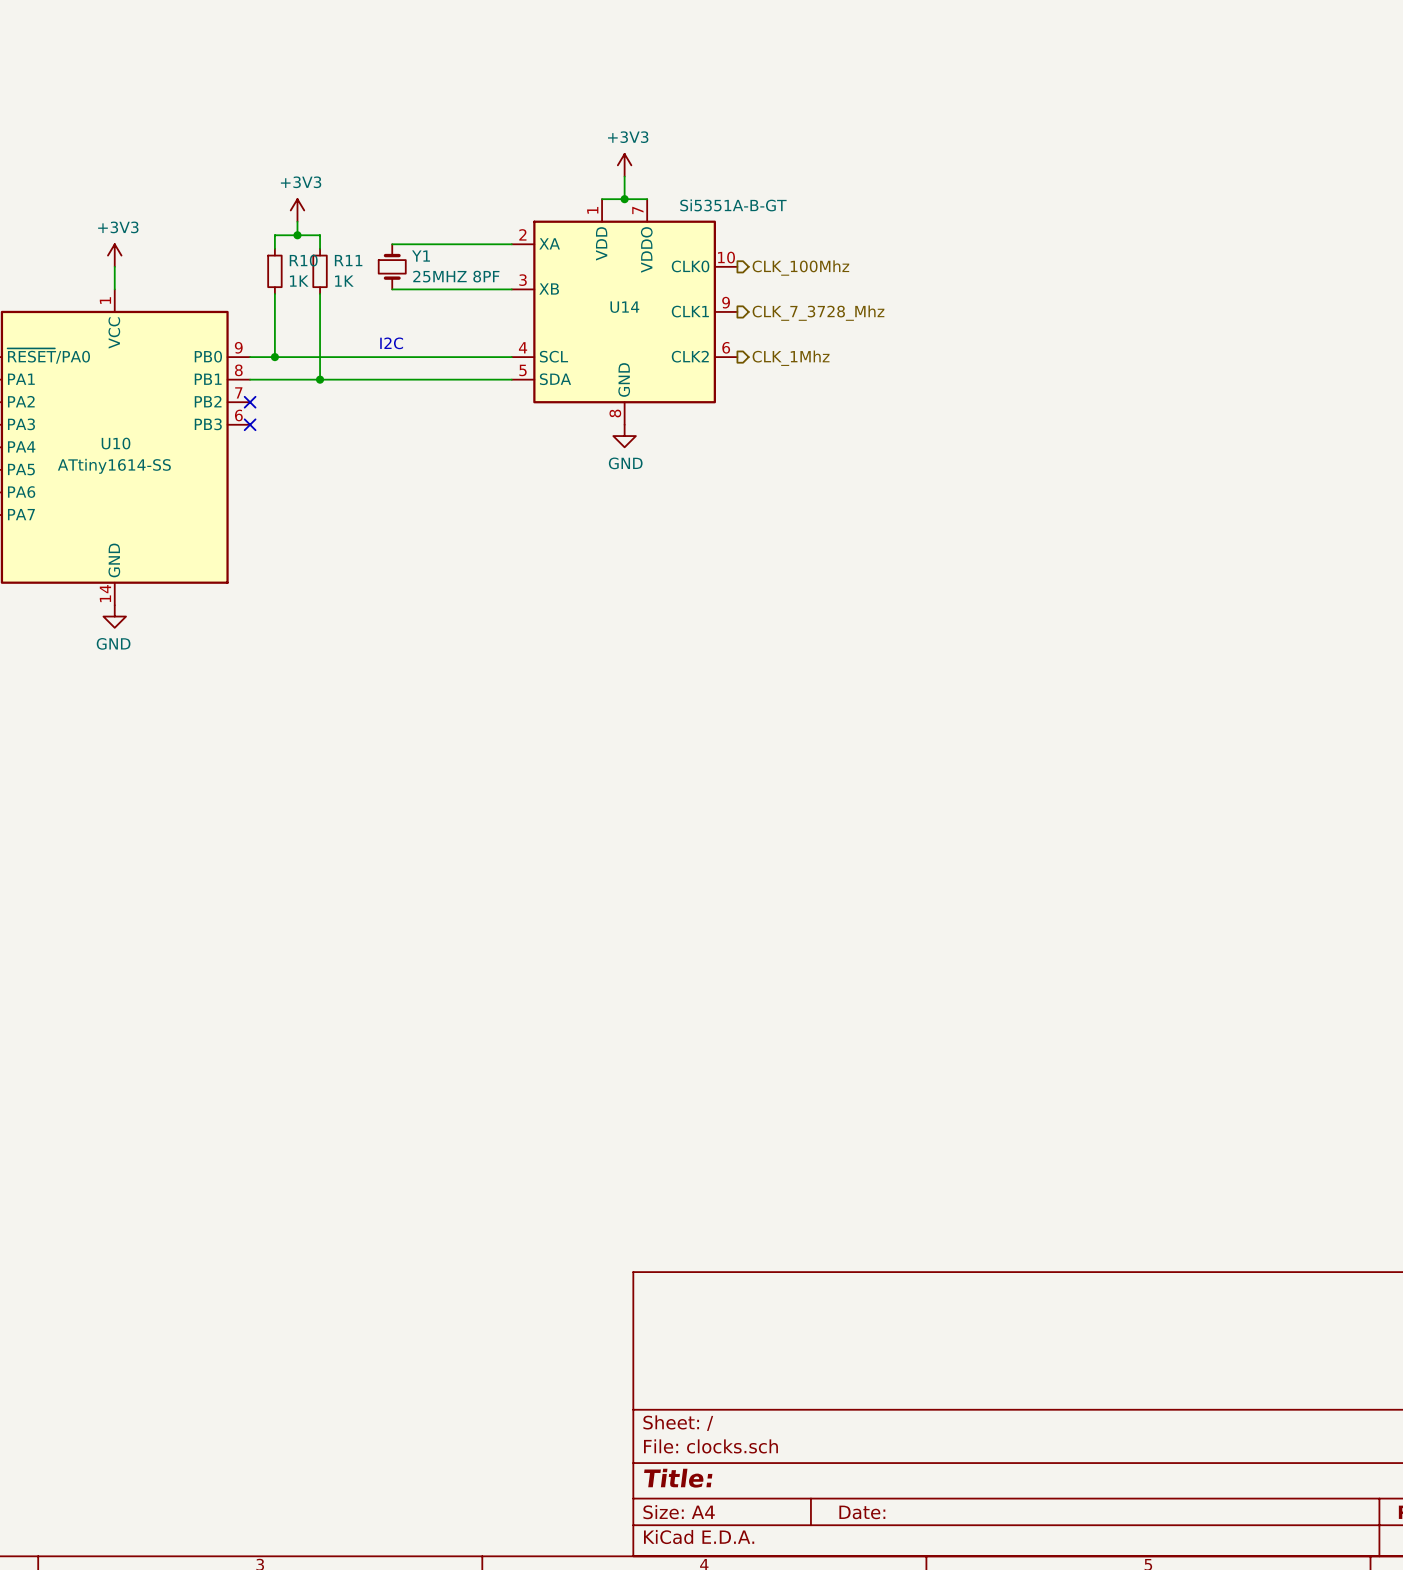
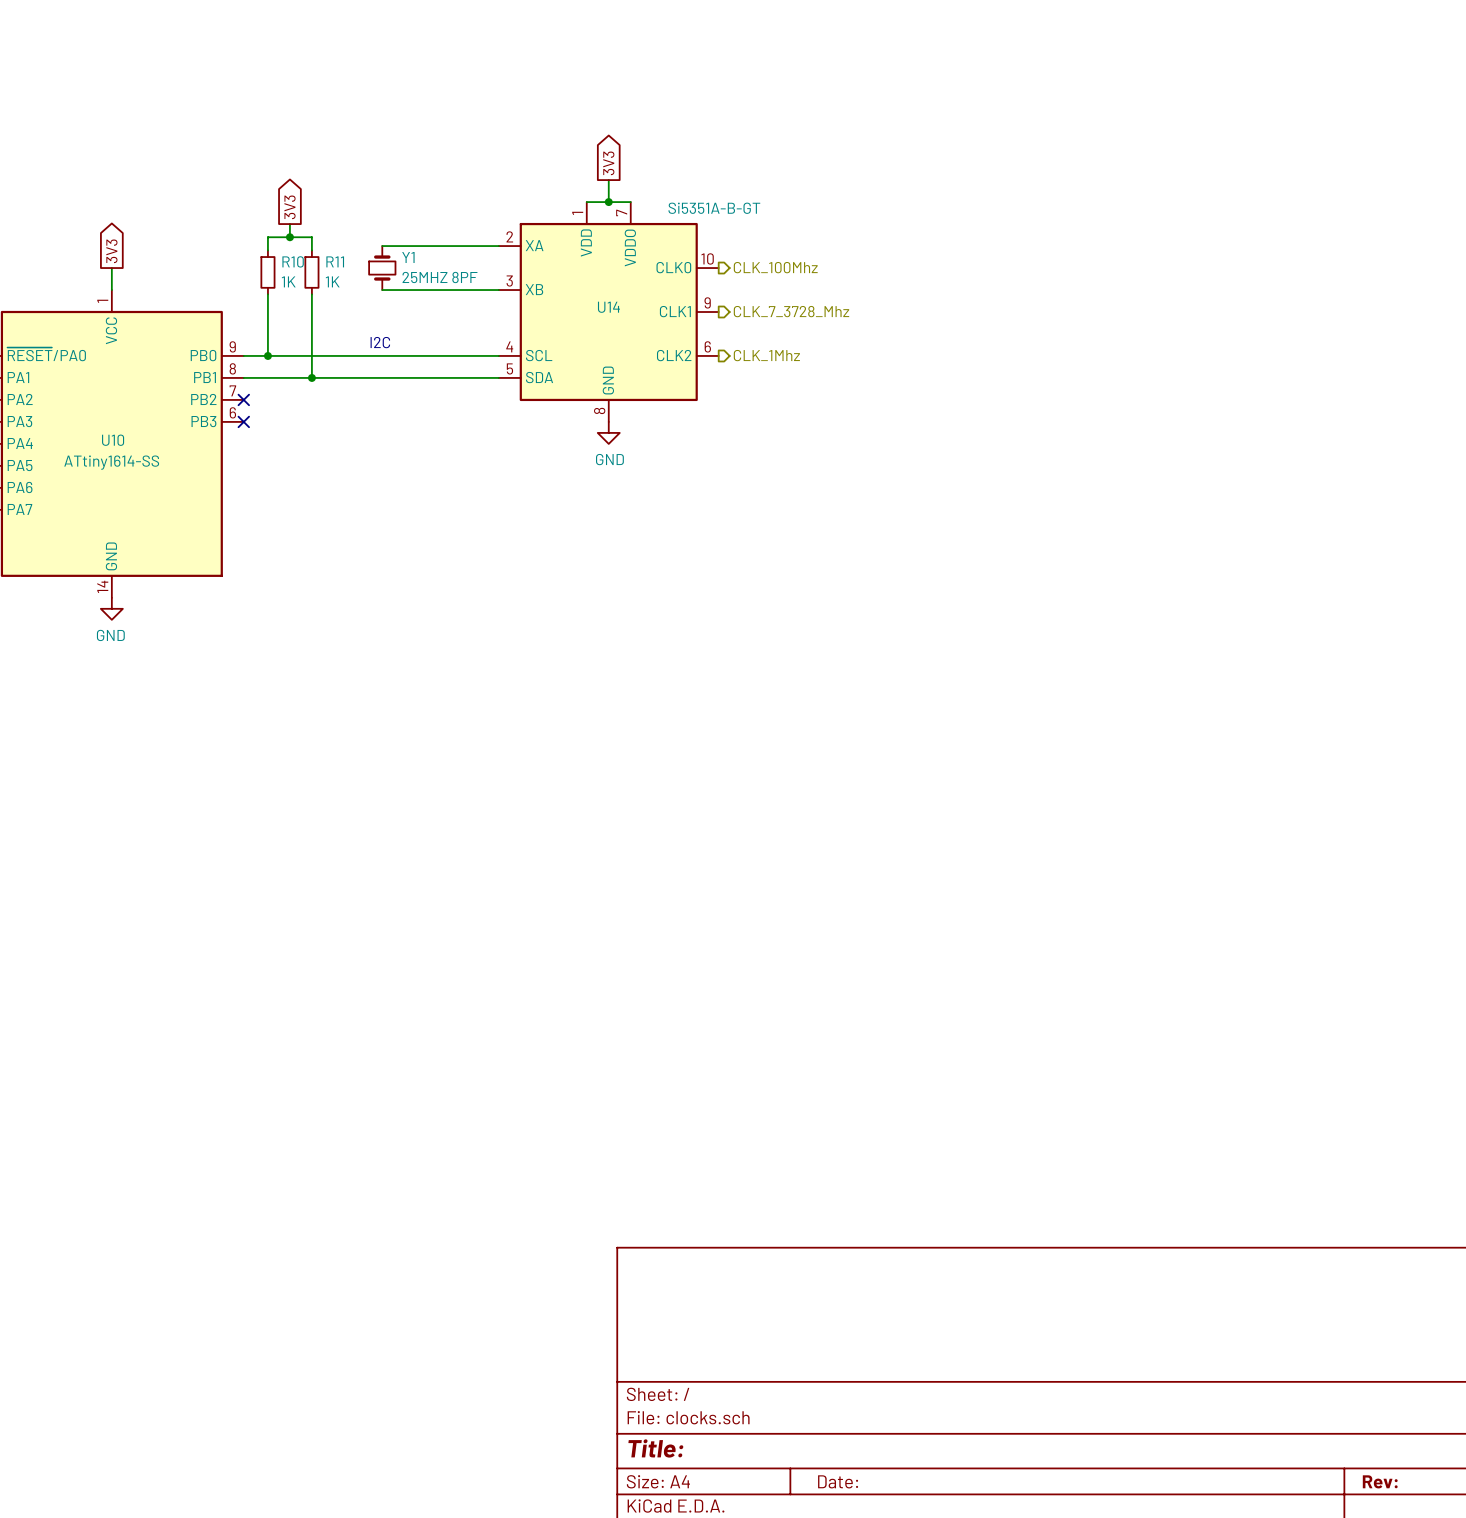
global label: none -> 3V3 (608, 163)
power symbol: +3V3 (624, 165) -> none
global label: none -> 3V3 (290, 207)
power symbol: +3V3 (297, 210) -> none
global label: none -> 3V3 (111, 251)
power symbol: +3V3 (114, 255) -> none

